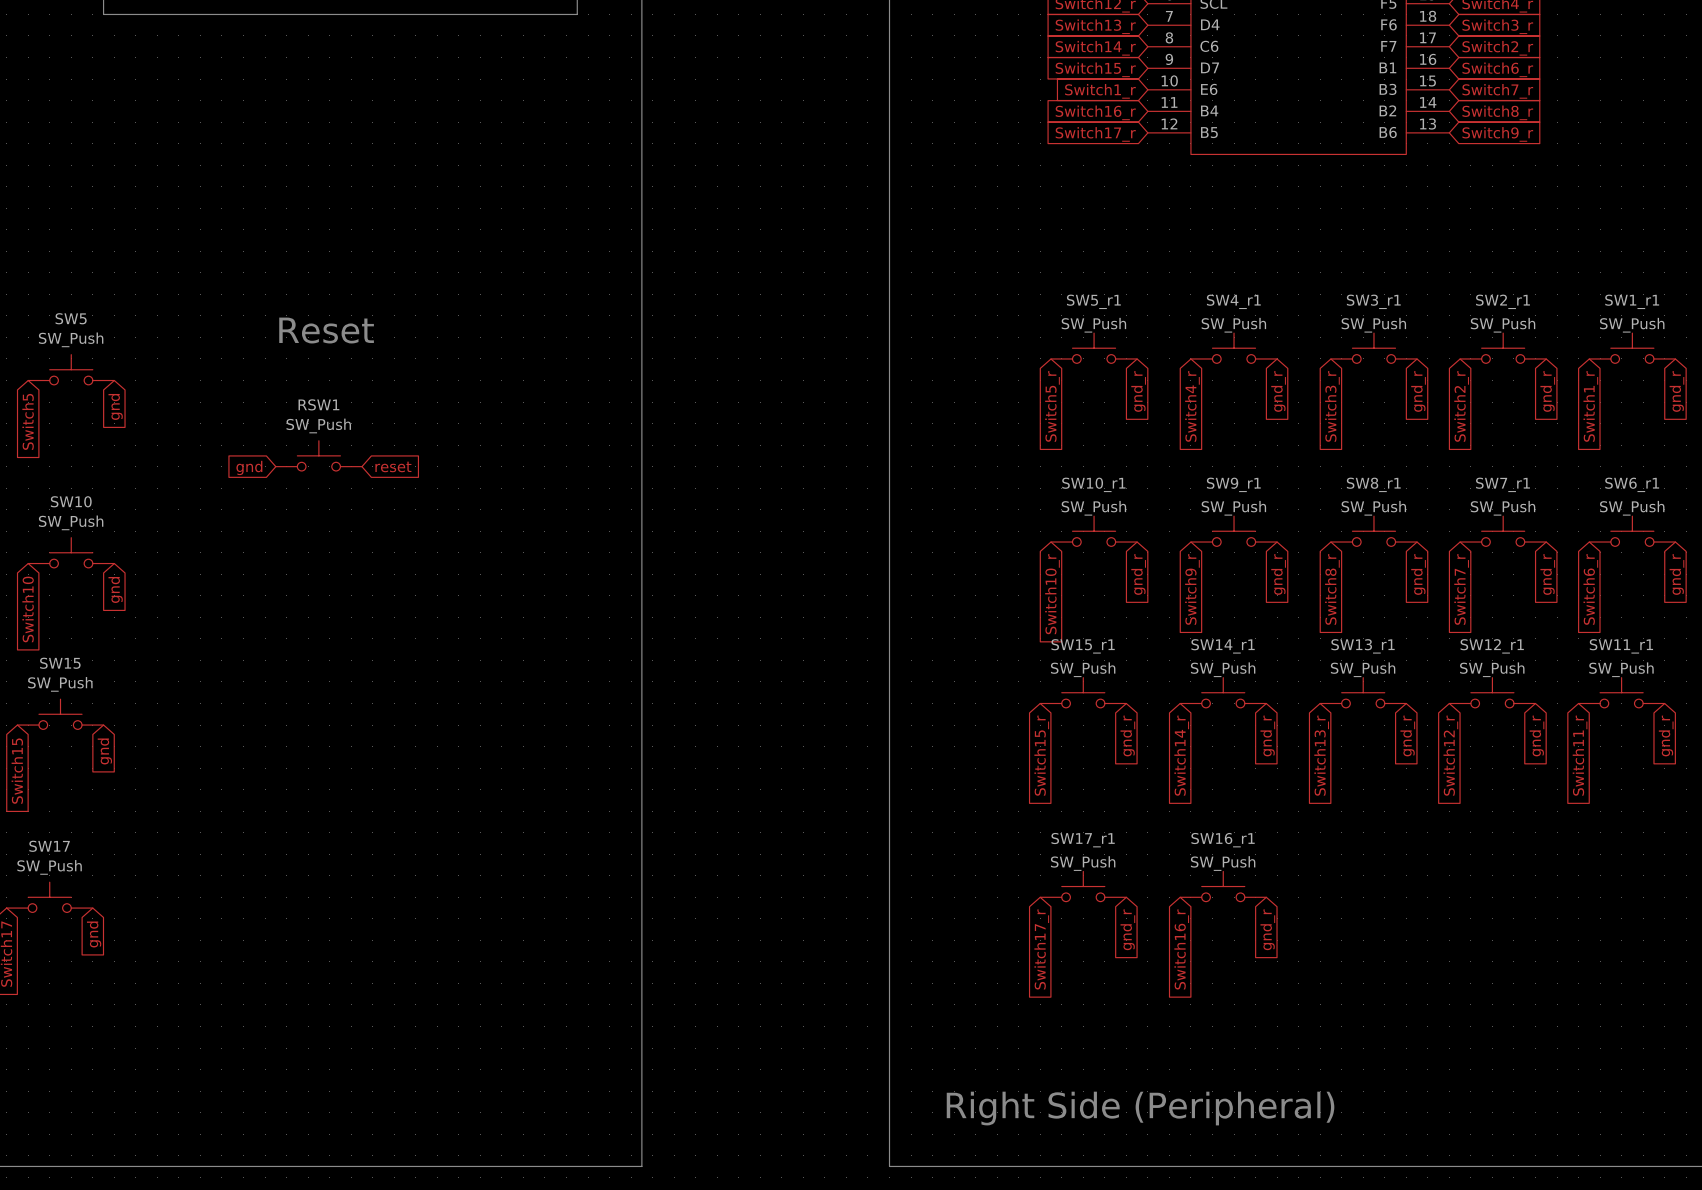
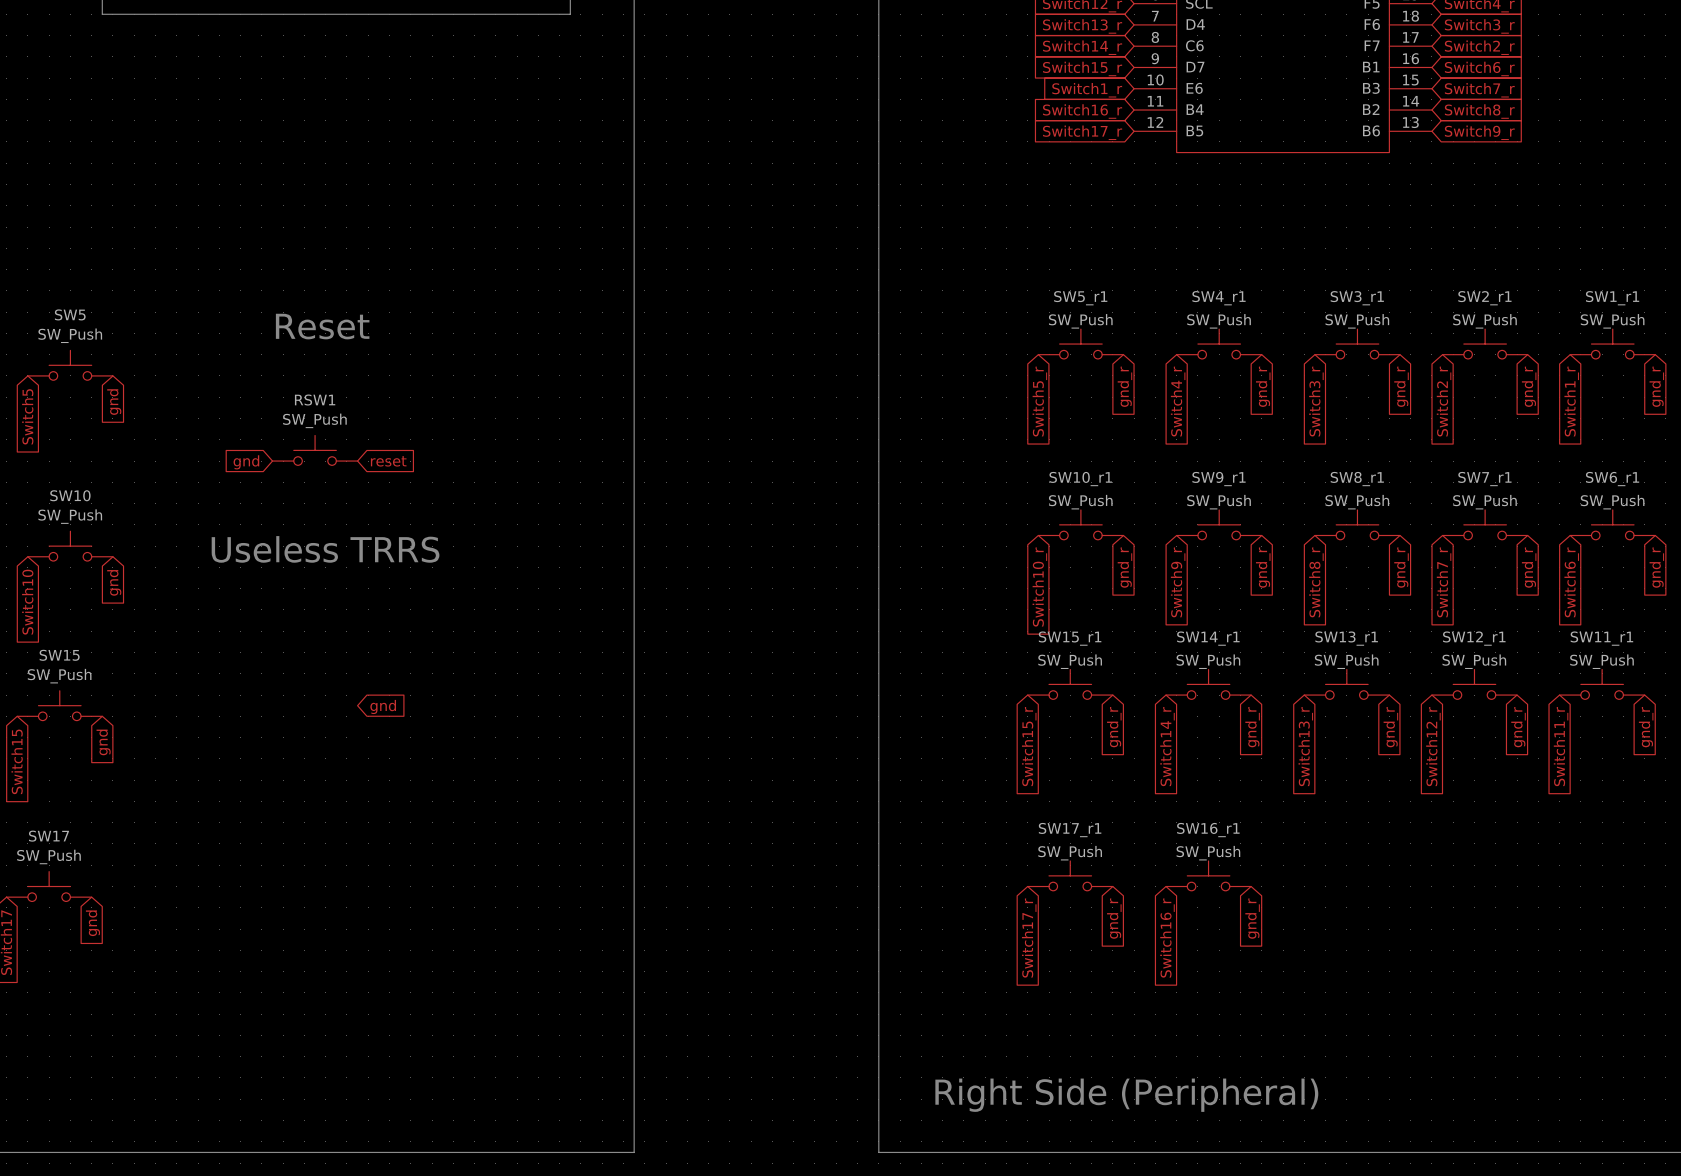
text: none -> Useless TRRS (325, 549)
global label: none -> gnd (383, 706)

